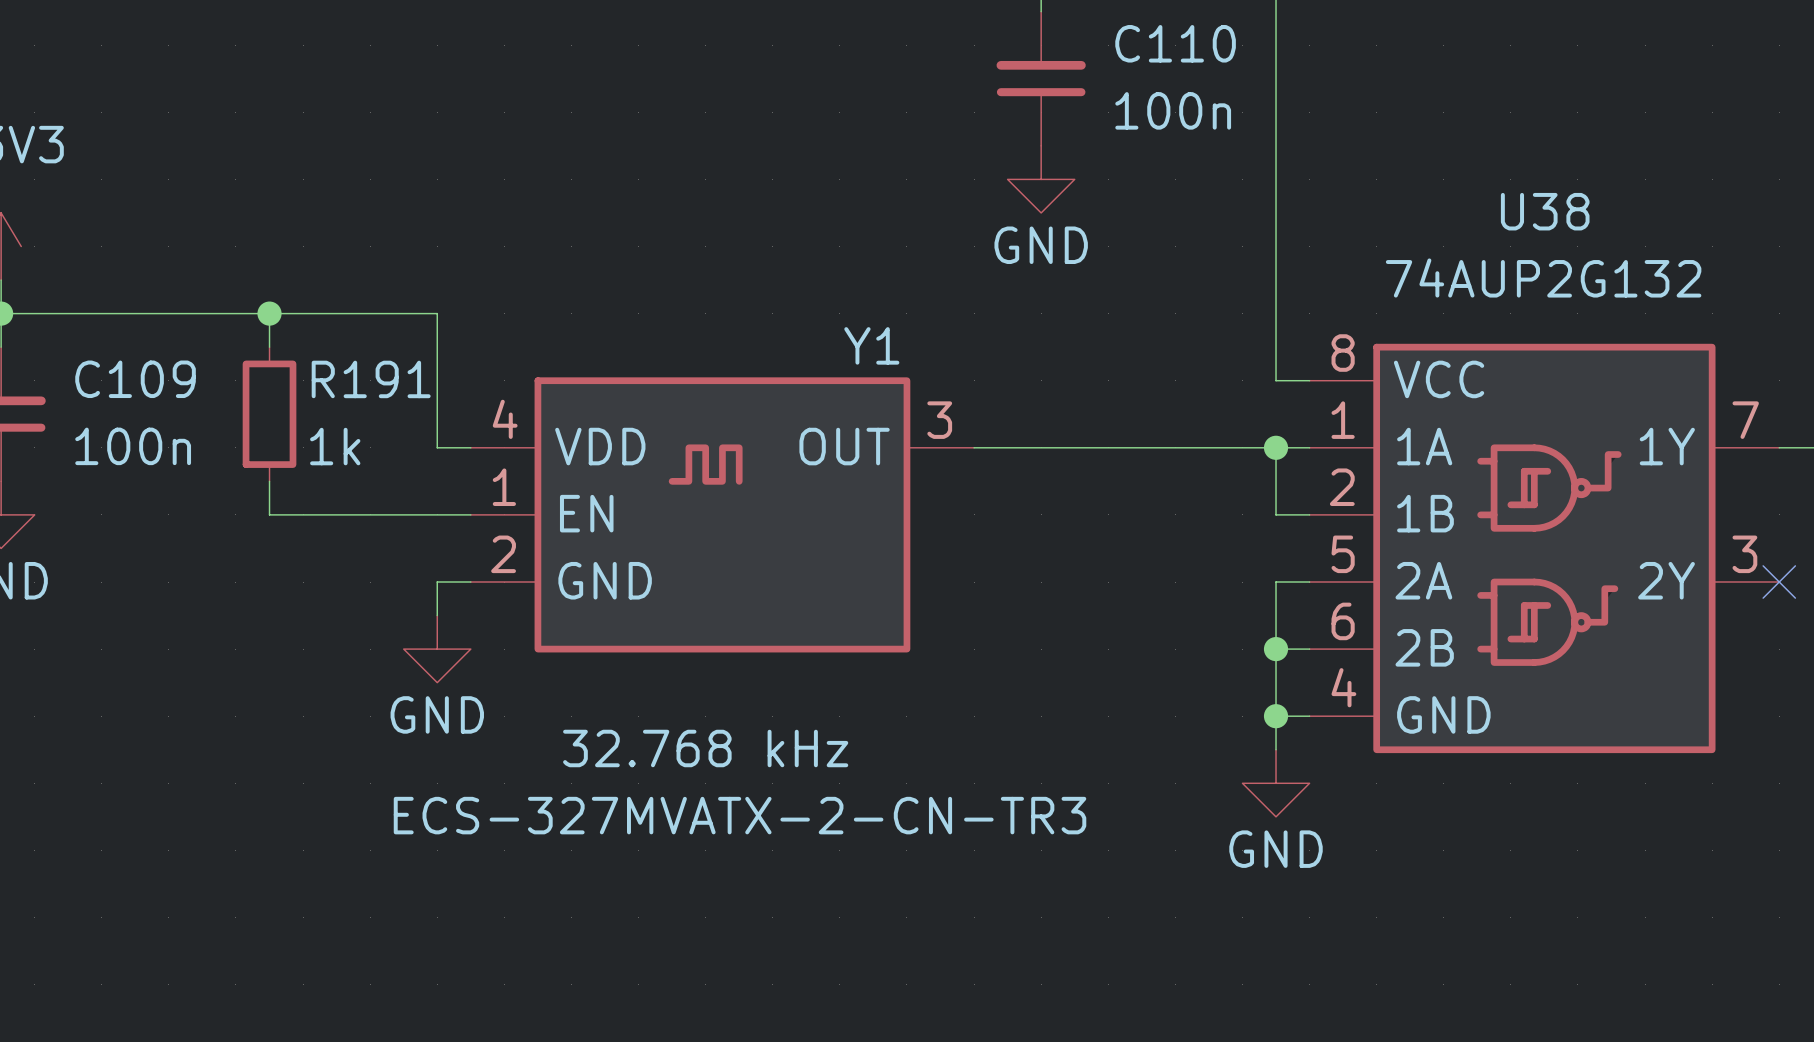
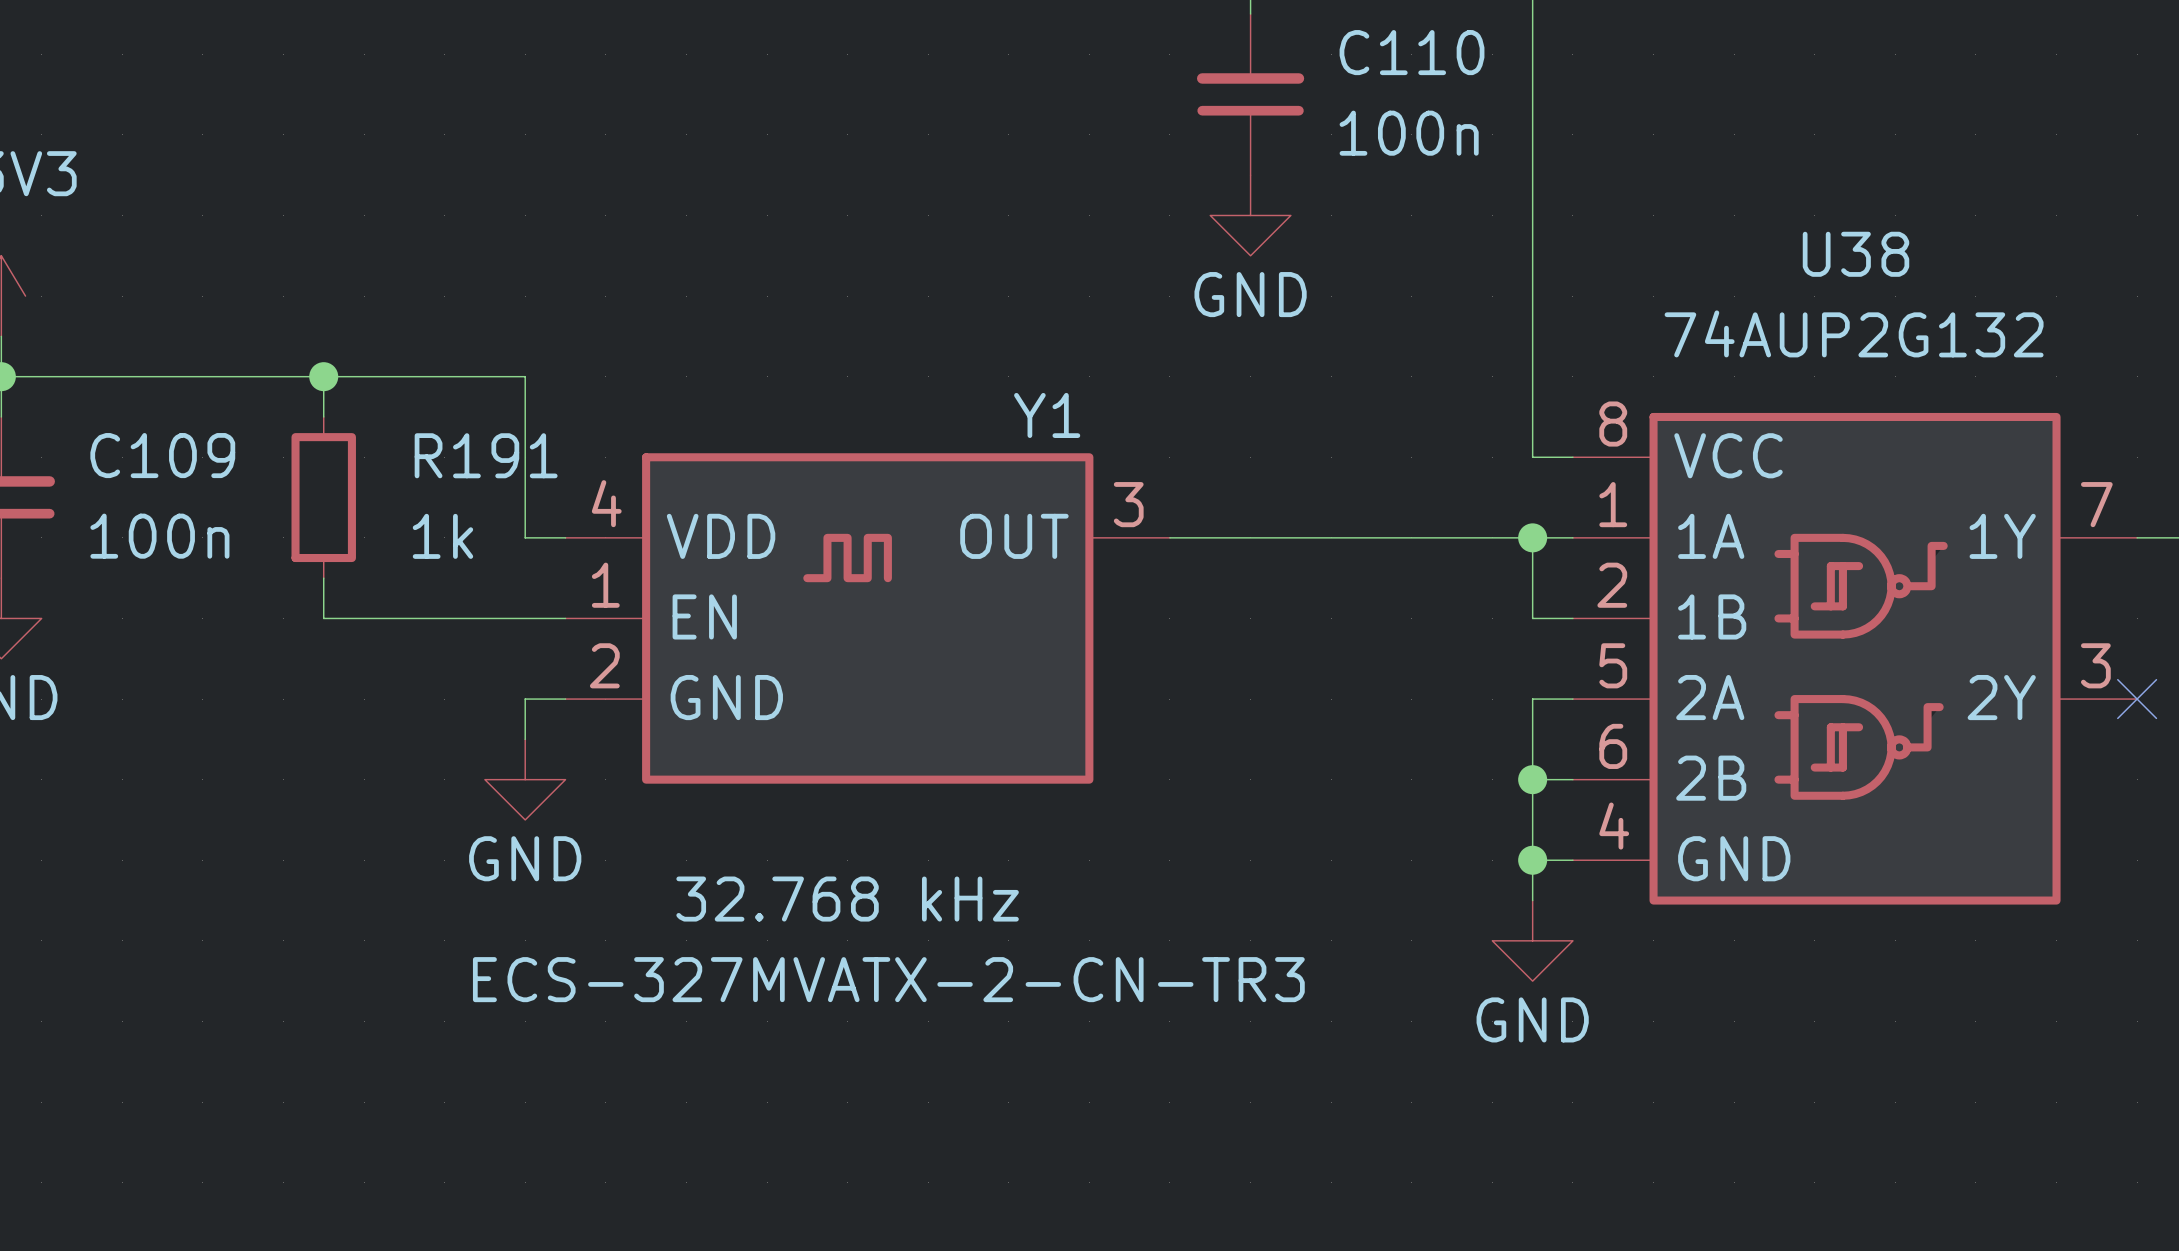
R191 name position: R191 (371, 379) -> R191 (486, 455)
R191 text position: 1k (335, 446) -> 1k (442, 536)

